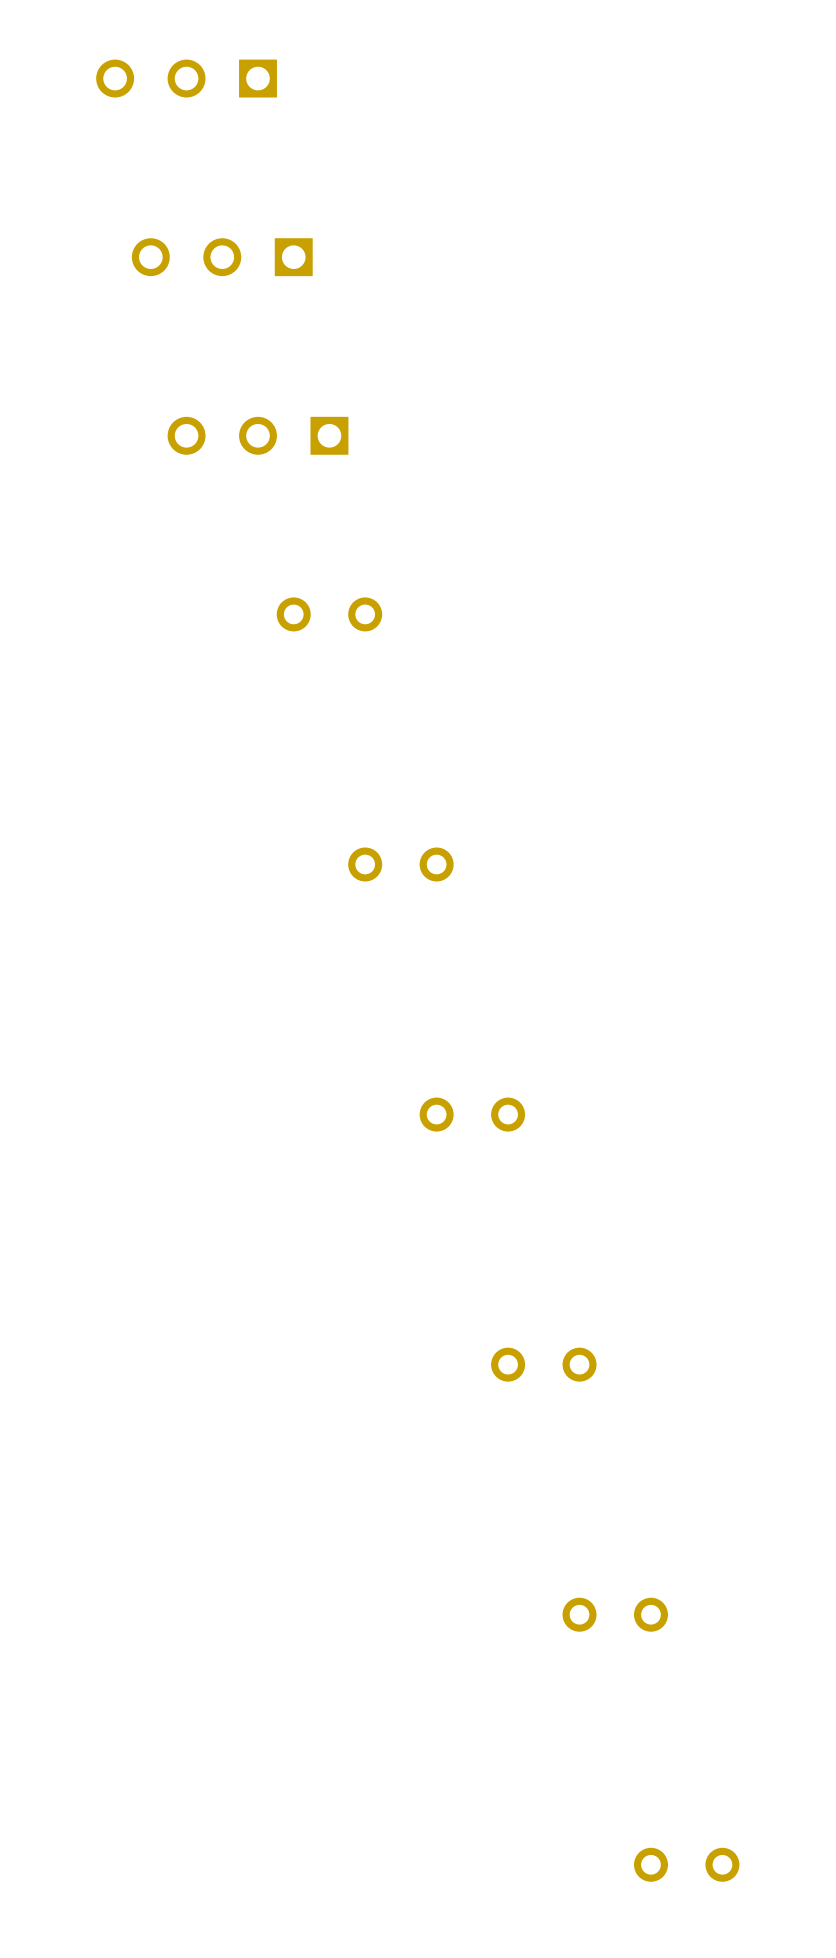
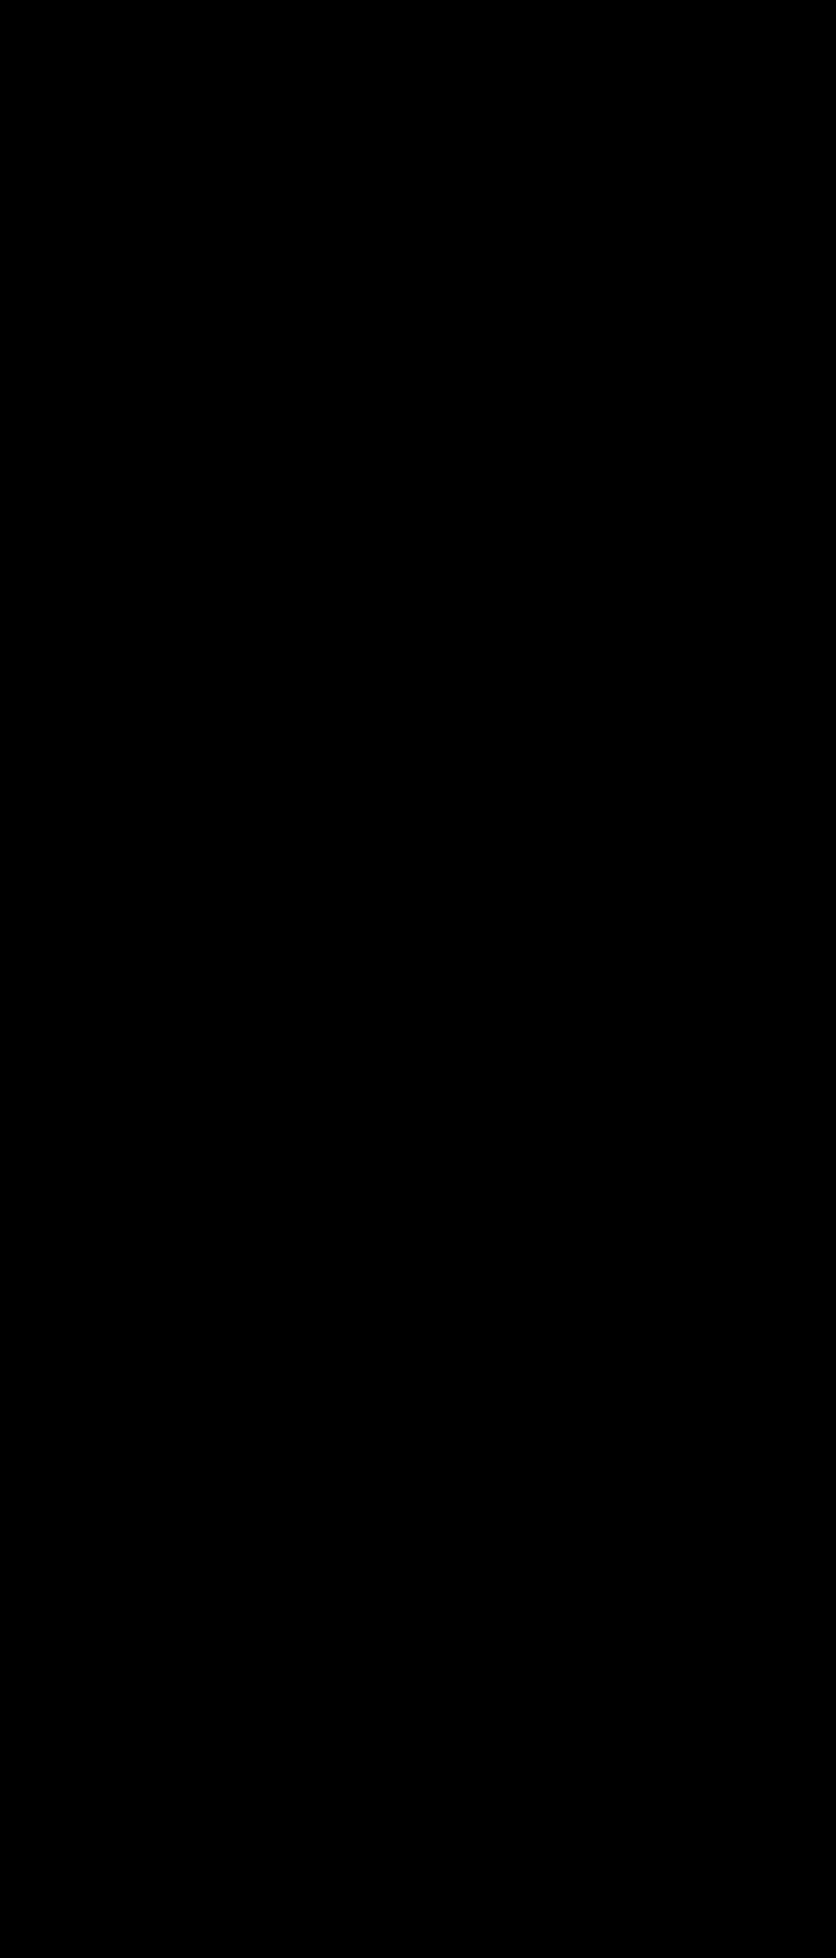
part: (186, 78) -> none
part: (222, 257) -> none
part: (258, 435) -> none
part: (329, 614) -> none
part: (400, 864) -> none
part: (472, 1114) -> none
part: (543, 1364) -> none
part: (615, 1614) -> none
part: (686, 1864) -> none

